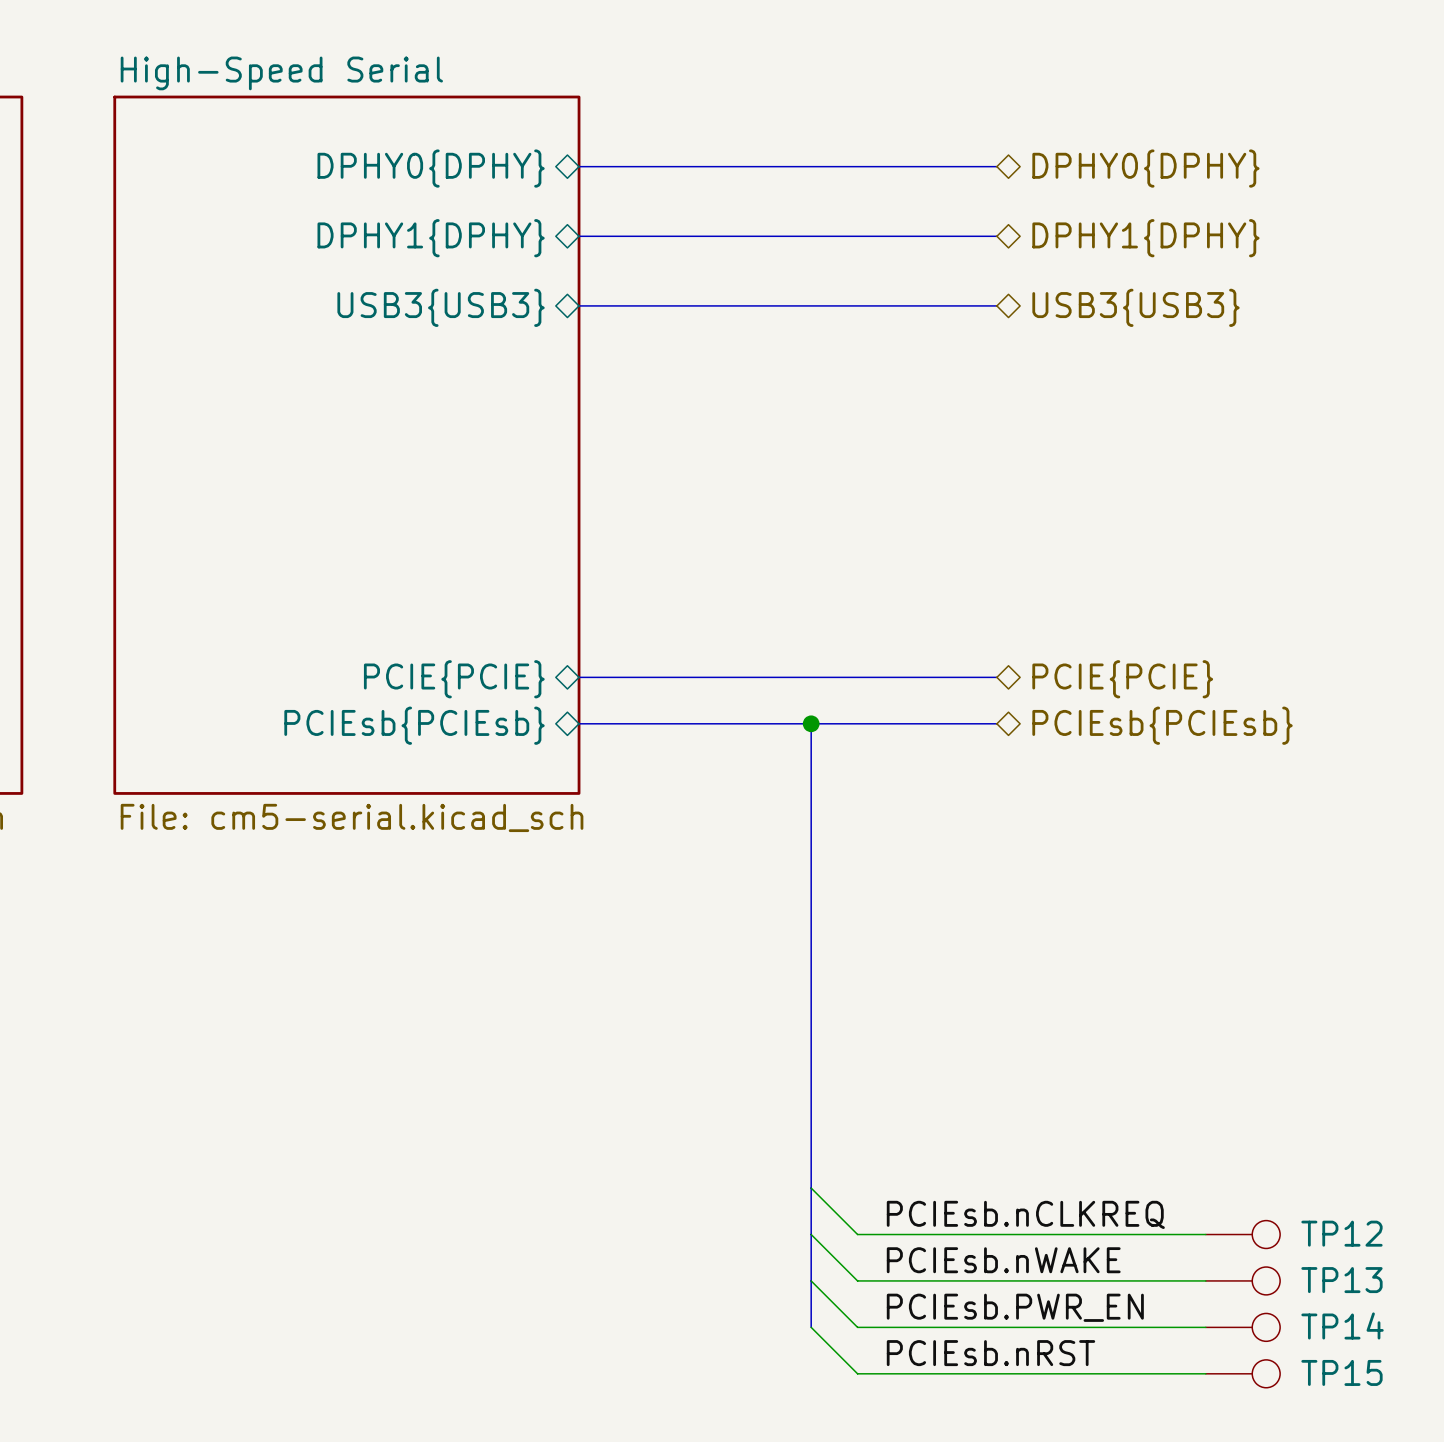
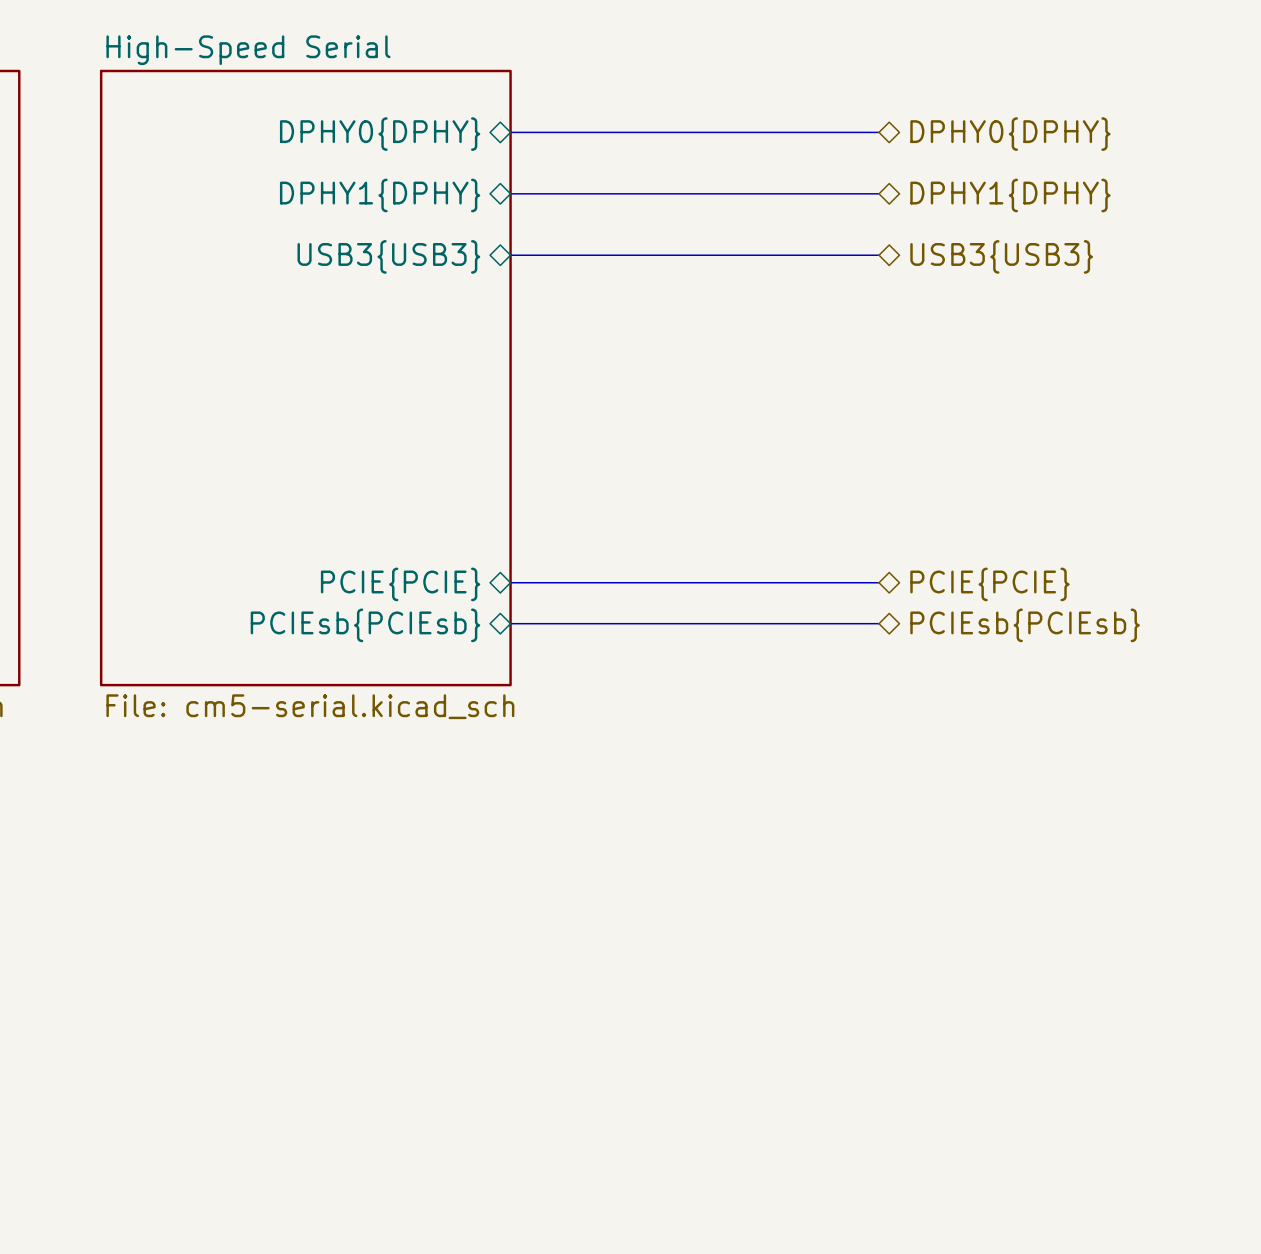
bus: (811, 723) (811, 1327) -> none
junction: (811, 723) -> none
wire: (811, 1188) (857, 1234) (1205, 1234) -> none
label: PCIEsb.nCLKREQ (1025, 1214) -> none
wire: (811, 1234) (857, 1280) (1205, 1280) -> none
TP12: (1242, 1234) -> none
label: PCIEsb.nWAKE (1003, 1260) -> none
wire: (811, 1280) (857, 1327) (1205, 1327) -> none
TP13: (1242, 1280) -> none
label: PCIEsb.PWR_EN (1015, 1307) -> none
wire: (811, 1327) (857, 1373) (1205, 1373) -> none
TP14: (1242, 1327) -> none
label: PCIEsb.nRST (990, 1353) -> none
TP15: (1242, 1373) -> none

